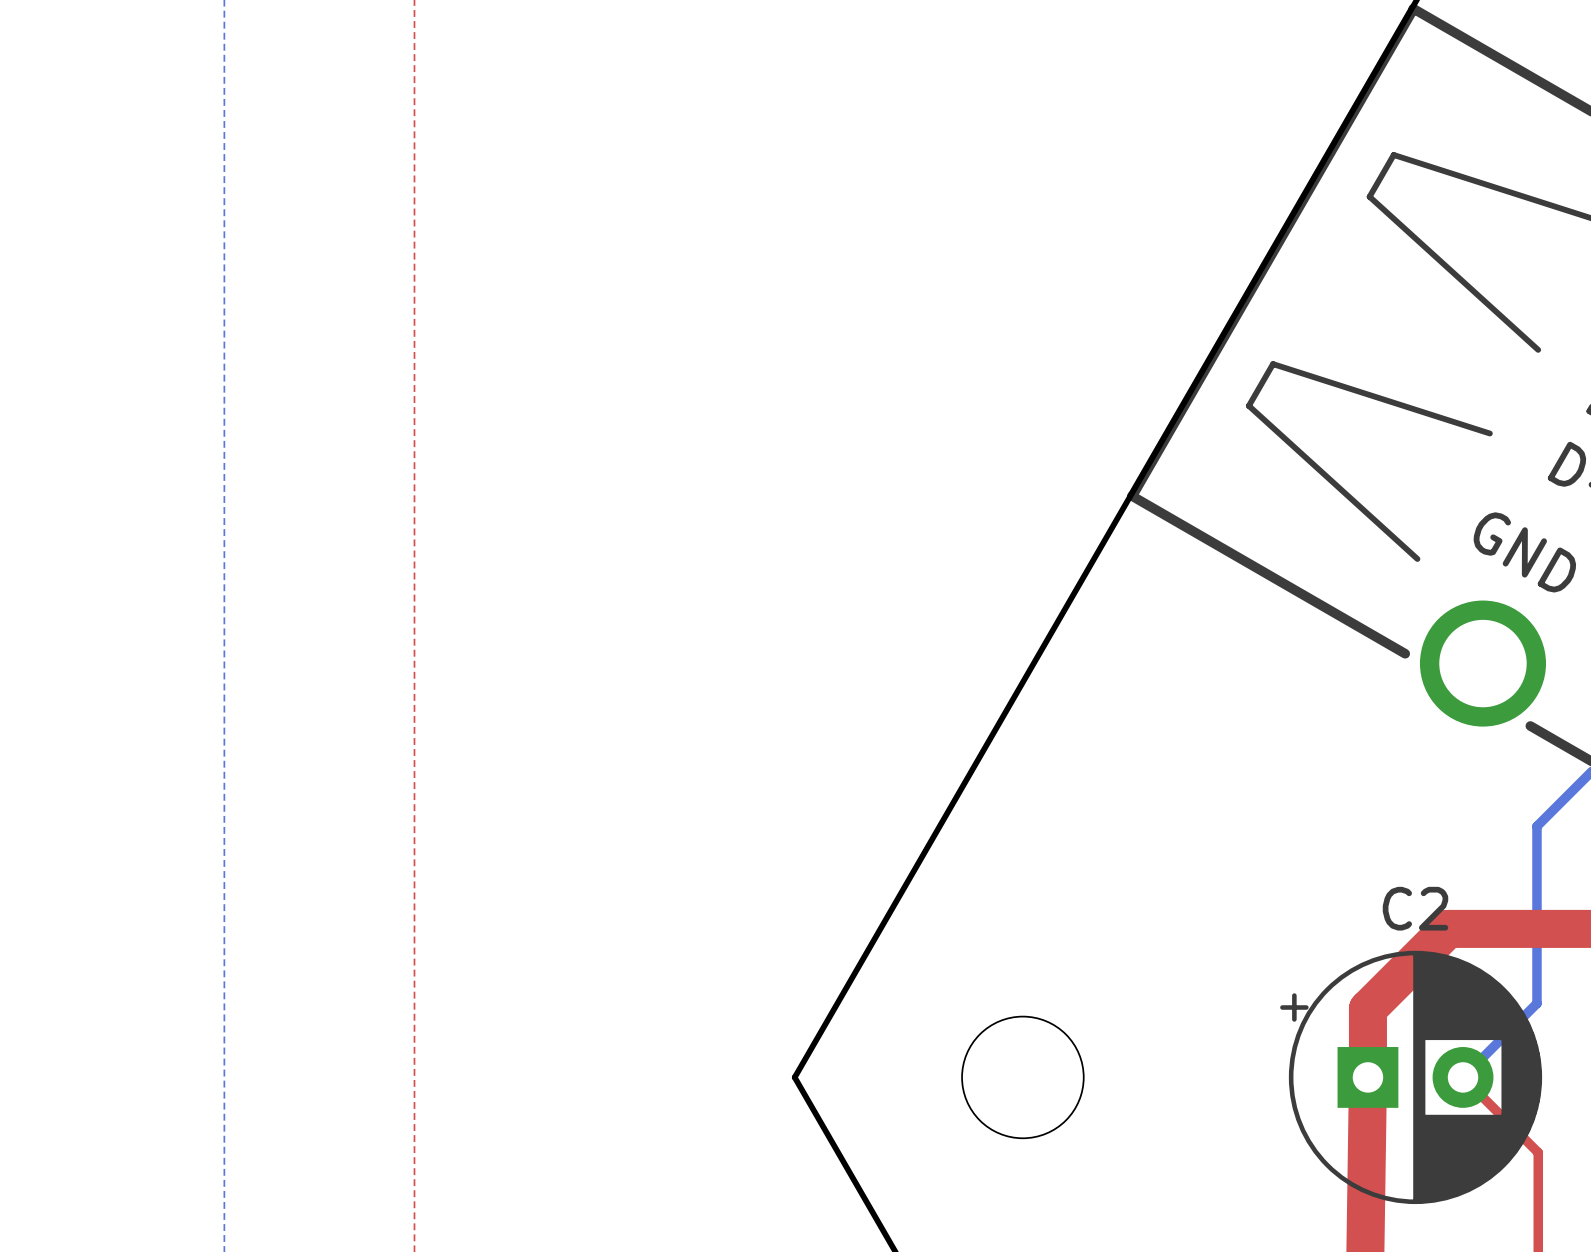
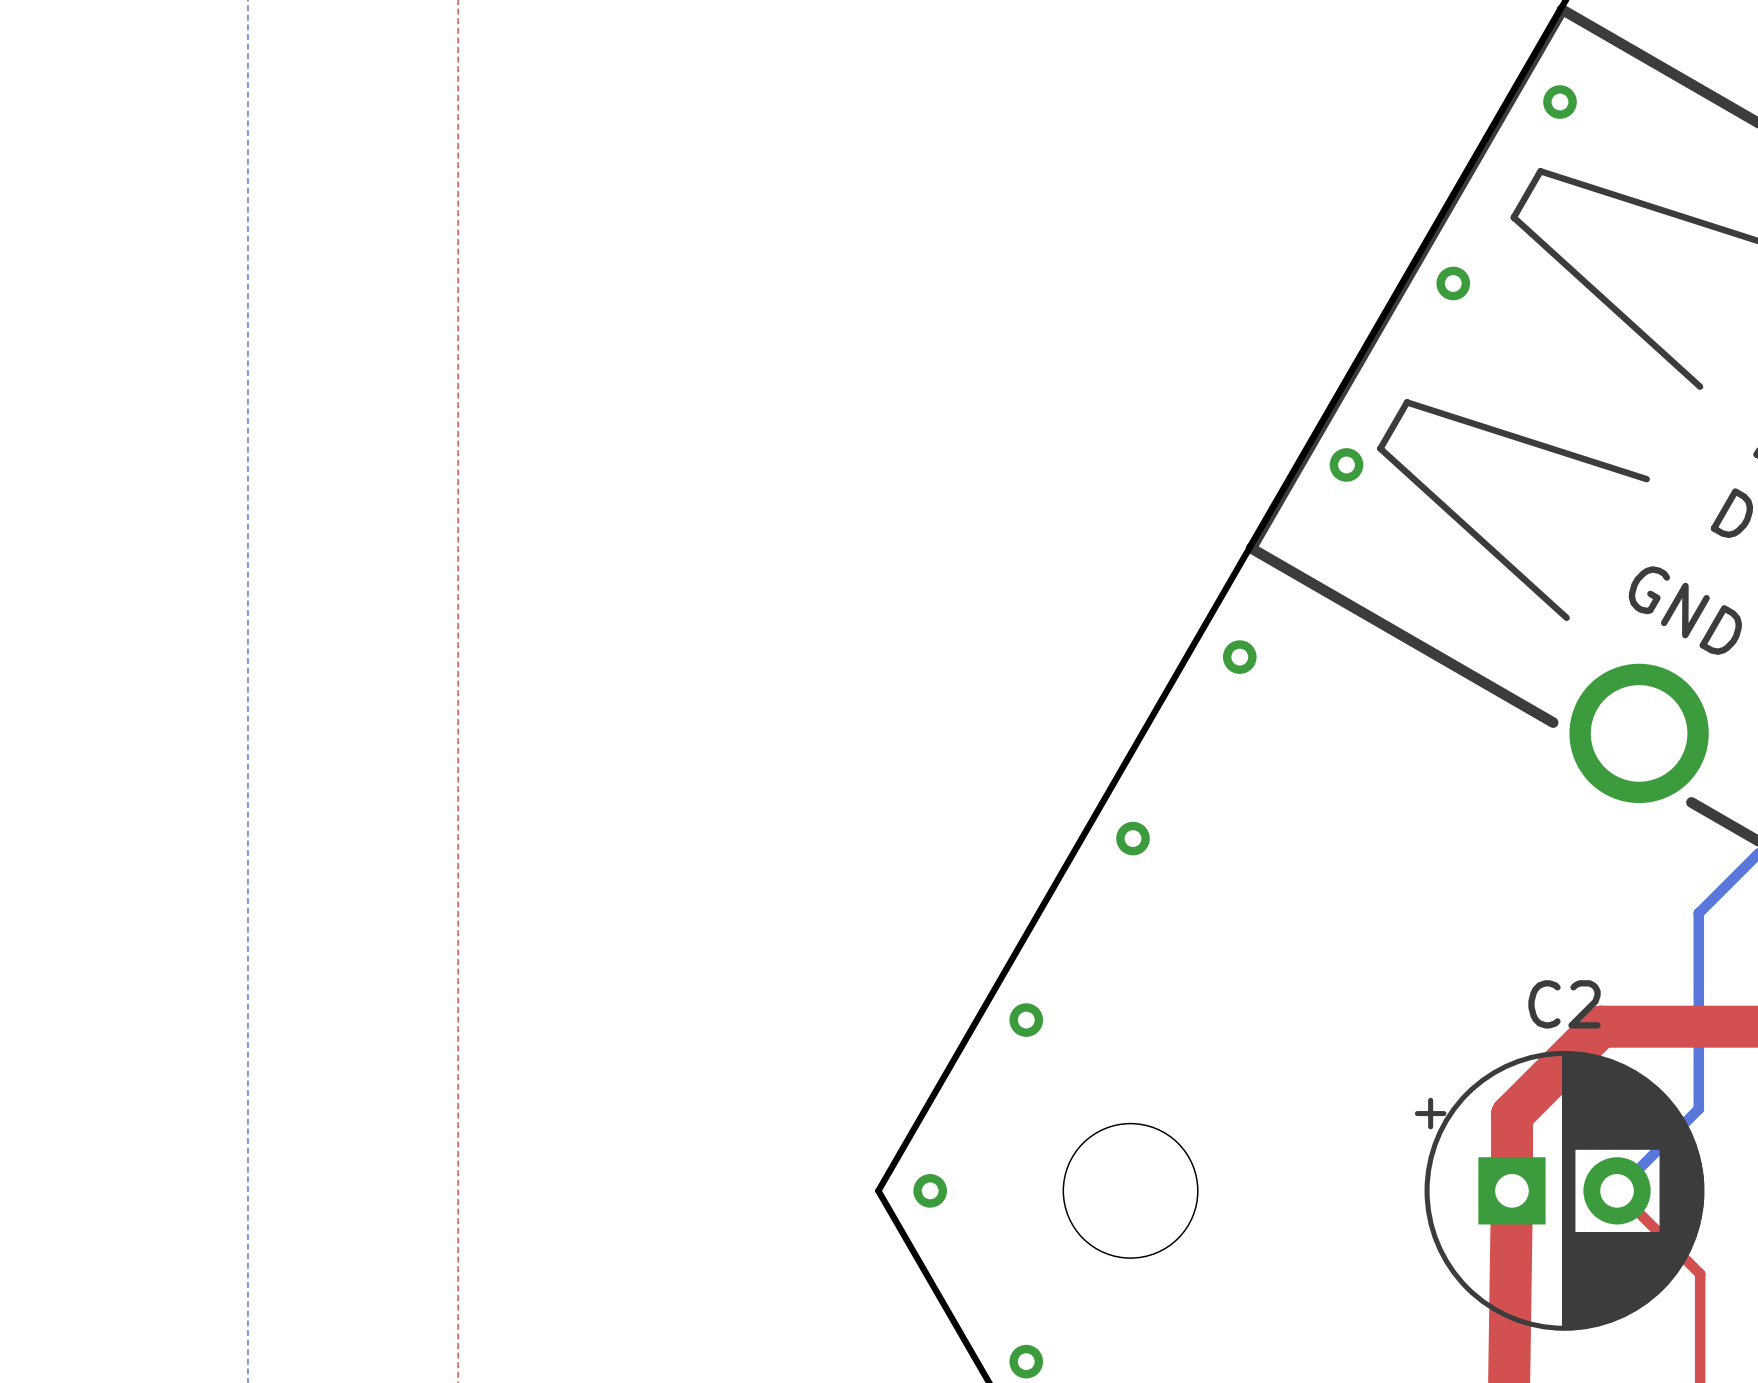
via: none -> (1560, 102)
via: none -> (1453, 283)
via: none -> (1346, 464)
via: none -> (1239, 657)
via: none -> (1133, 838)
via: none -> (1026, 1020)
via: none -> (930, 1190)
via: none -> (1026, 1361)

